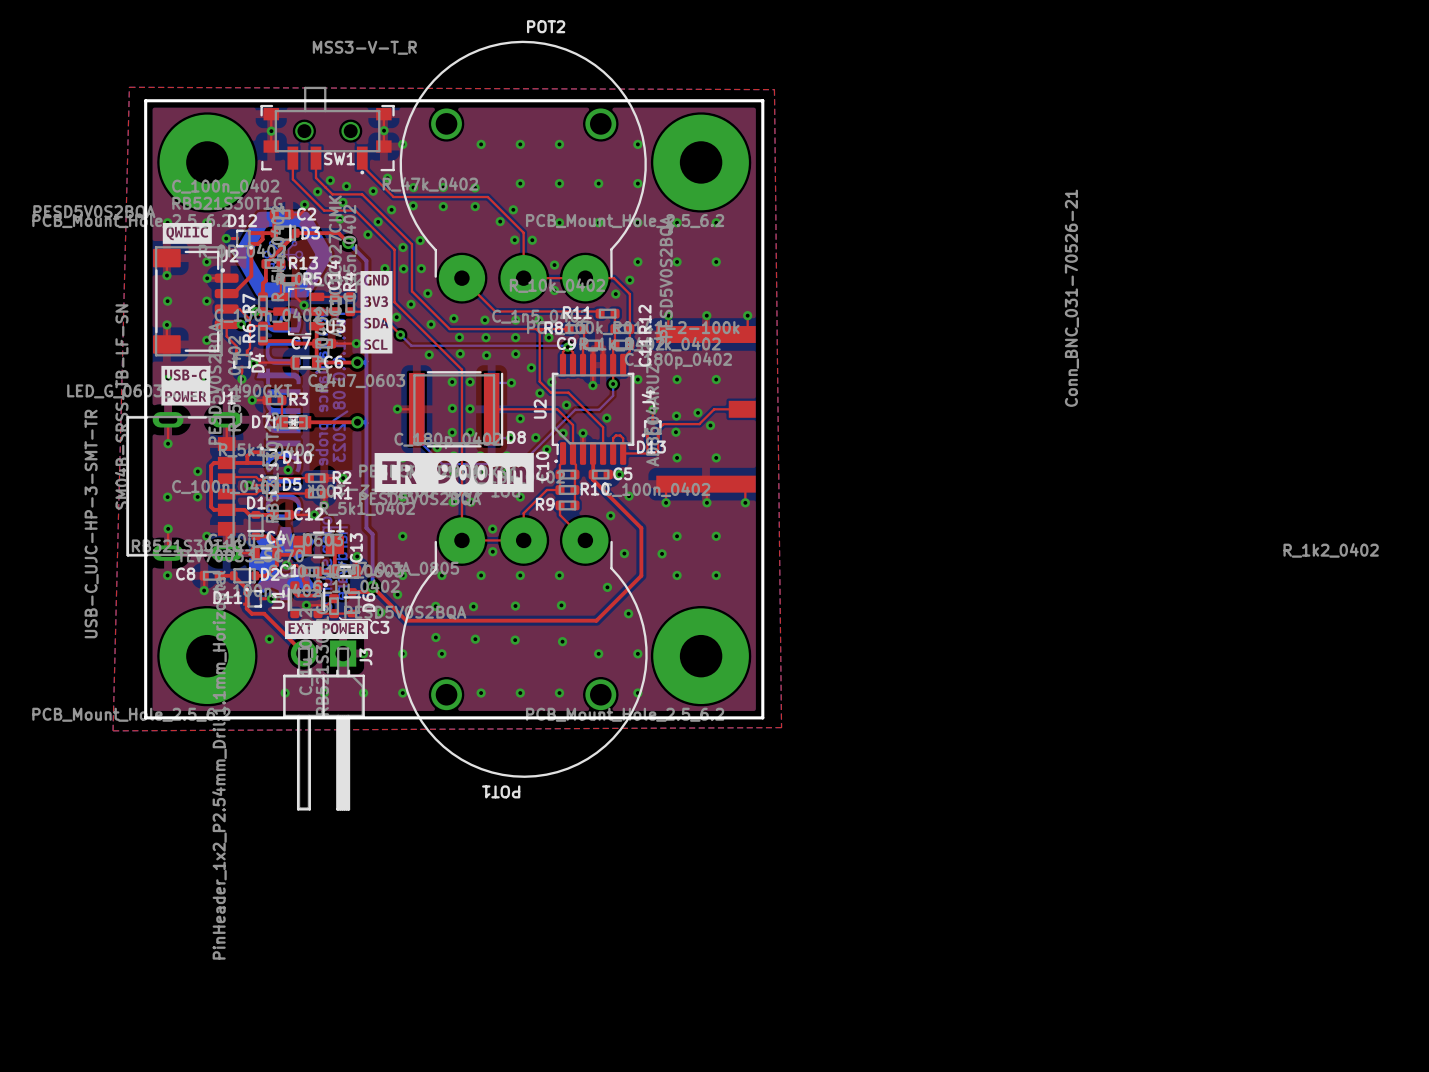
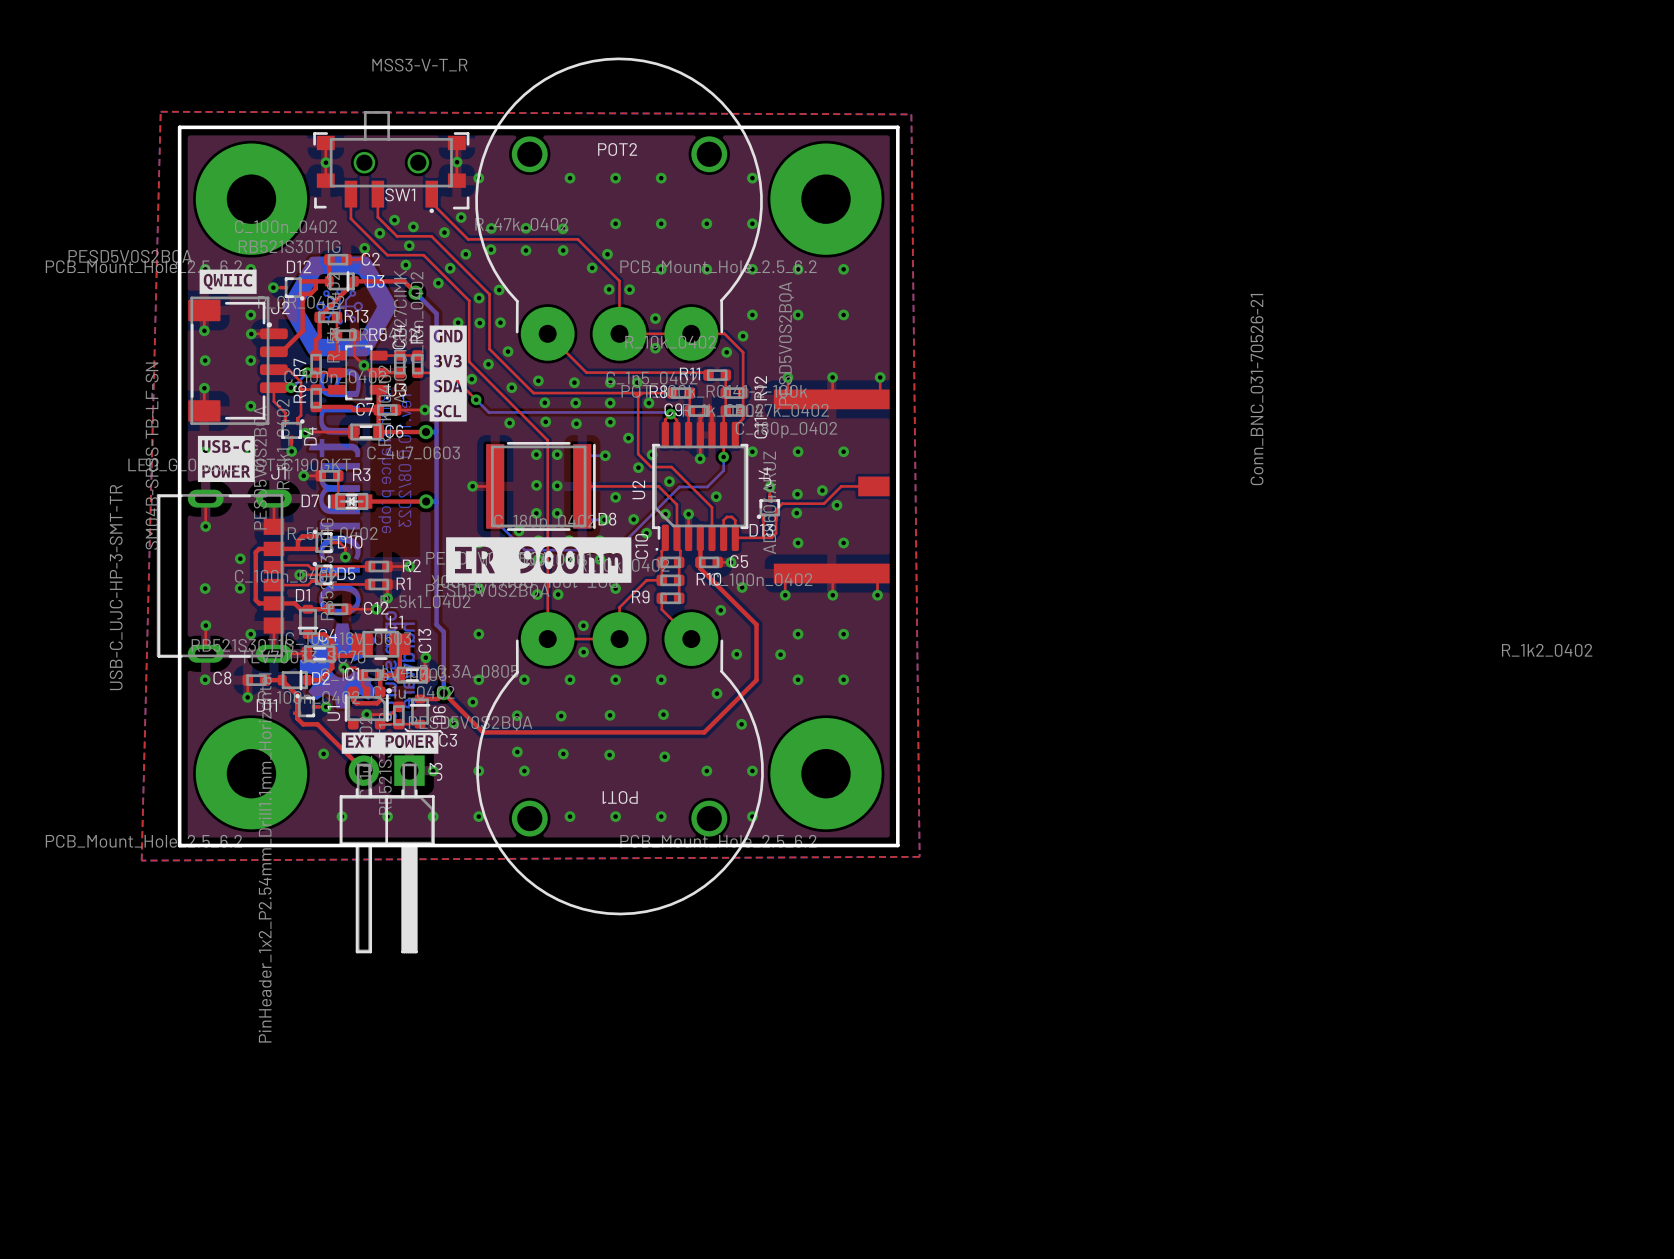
POT2 name position: POT2 (546, 26) -> POT2 (617, 149)
POT1 name position: POT1 (501, 791) -> POT1 (620, 797)

